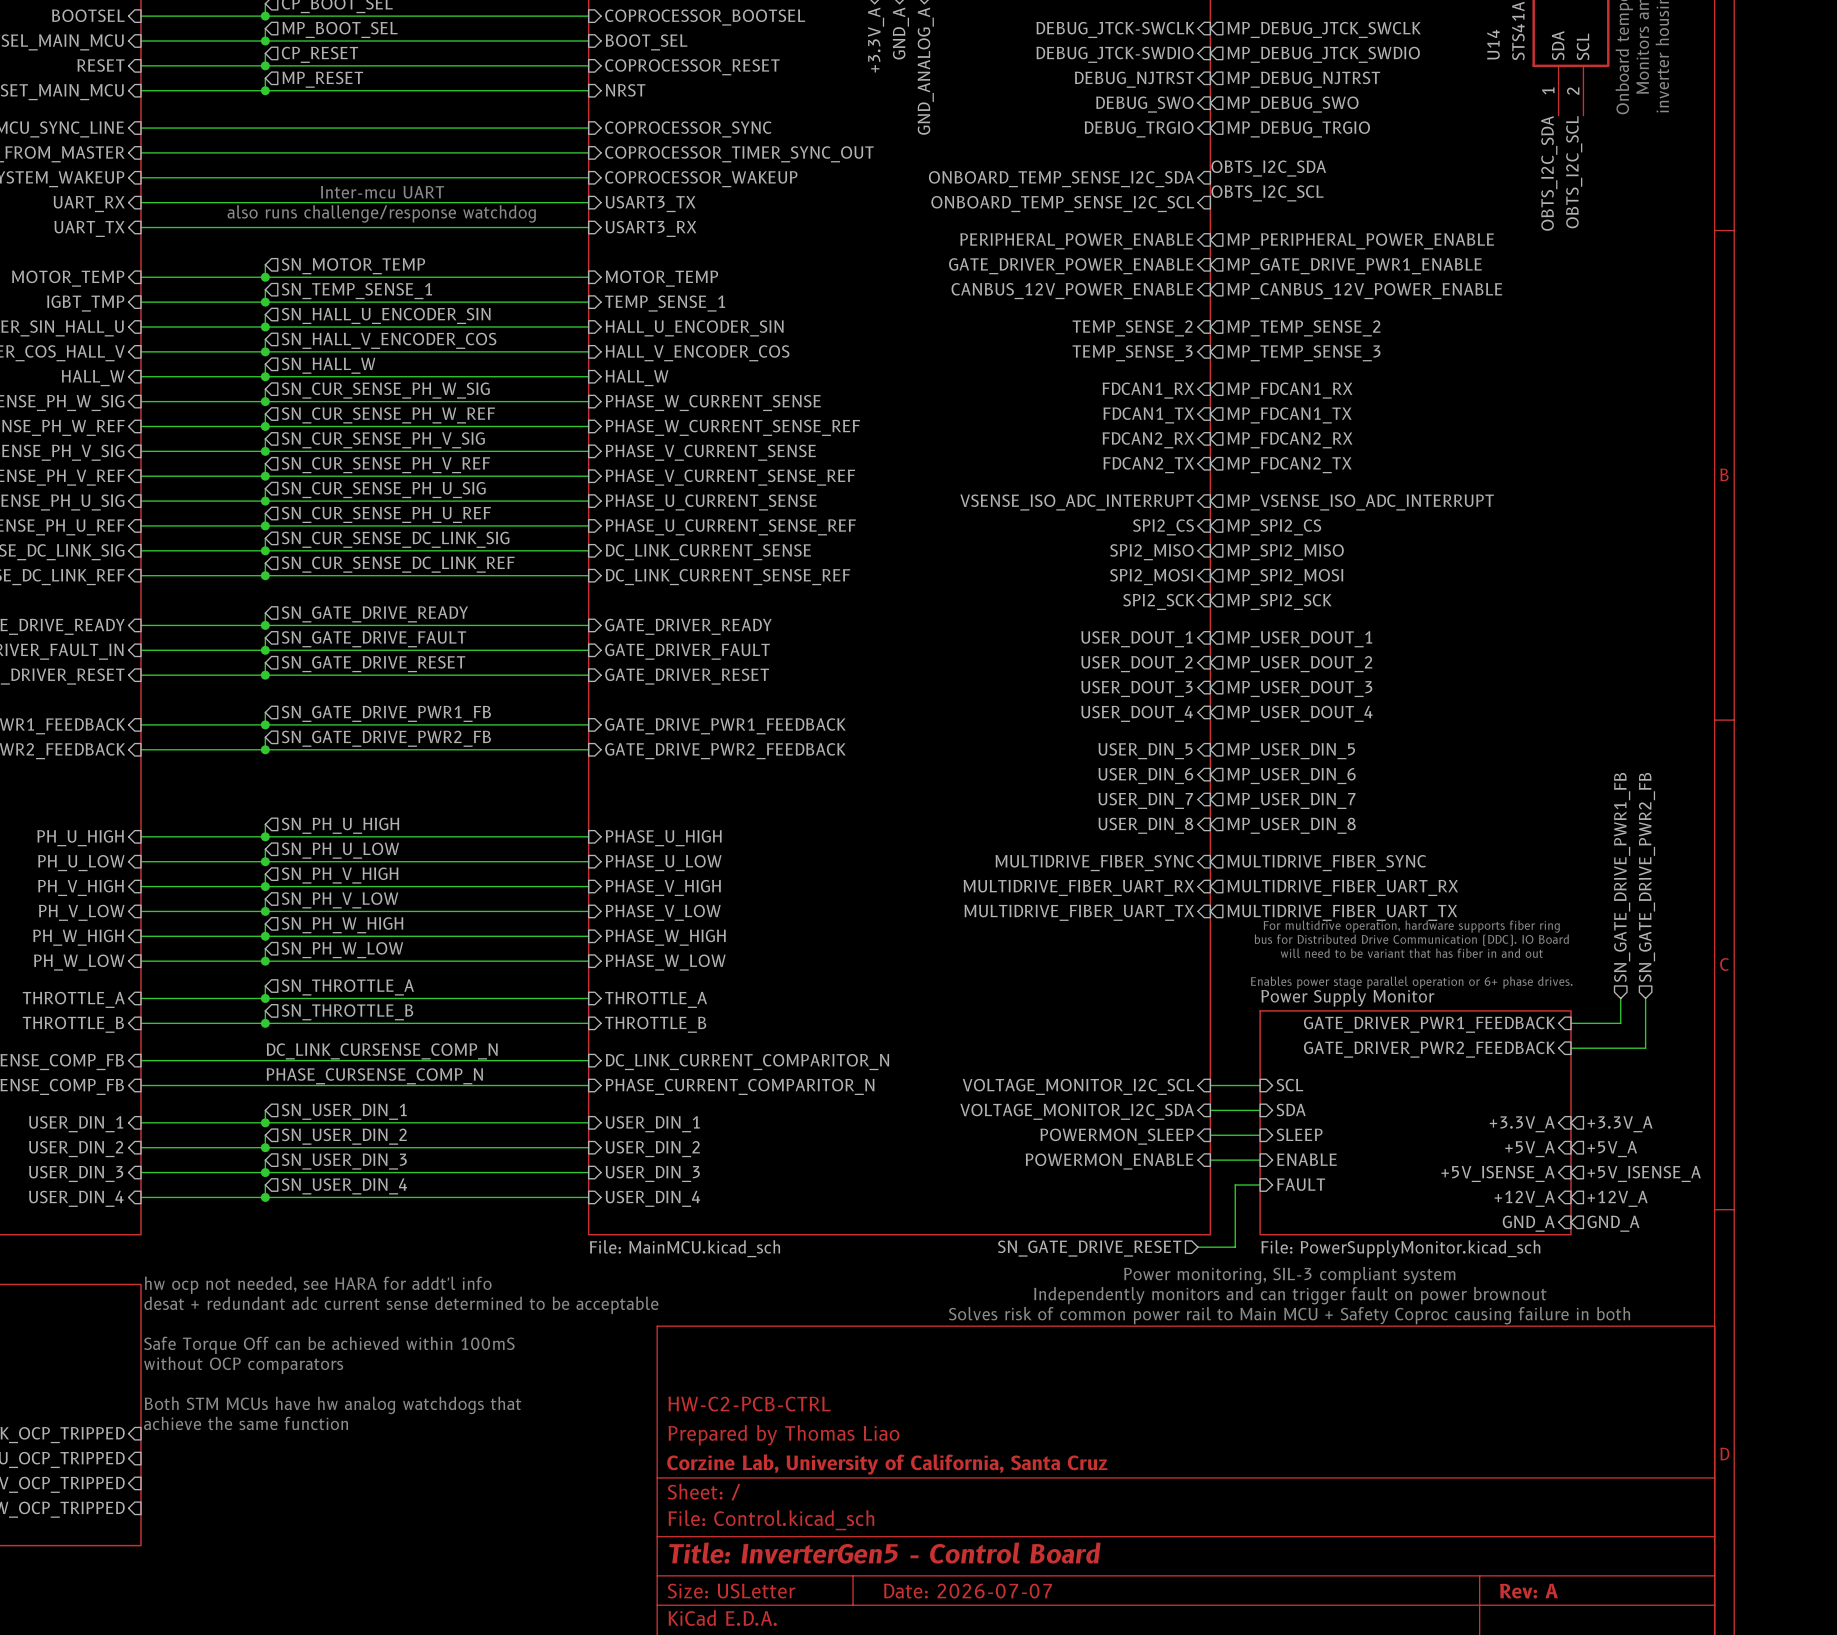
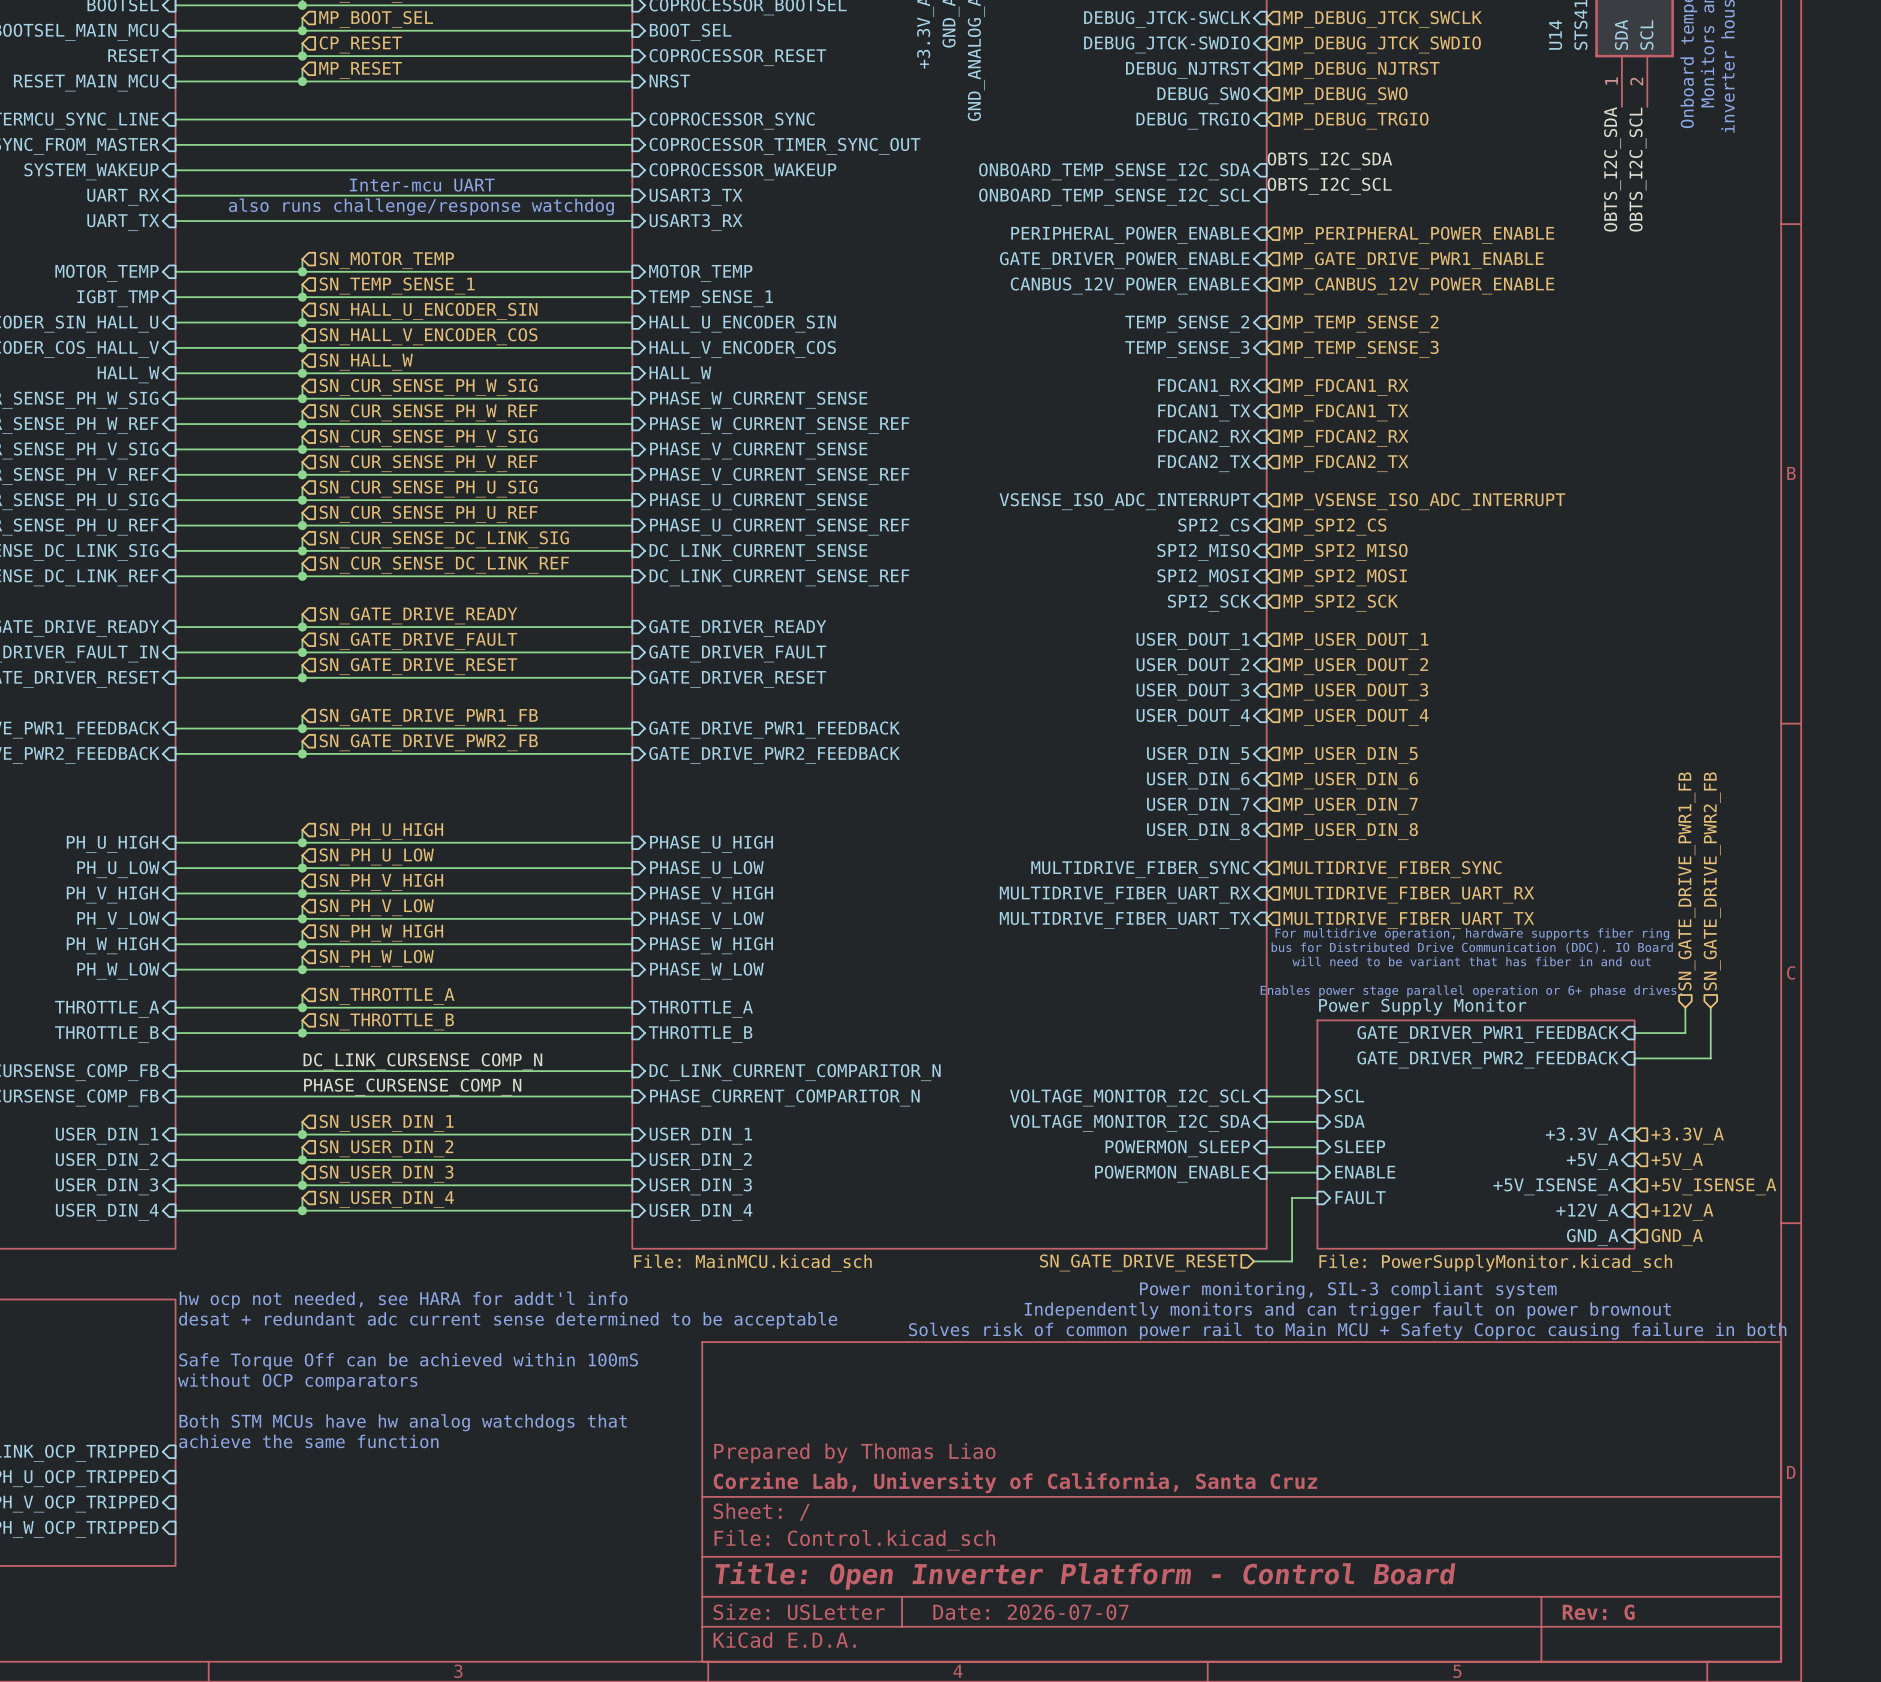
title block: HW-C2-PCB-CTRL (749, 1404) -> none
title block: Title: InverterGen5 - Control Board (884, 1553) -> Title: Open Inverter Platform - Control Board (1085, 1575)
title block: Rev: A (1528, 1591) -> Rev: G (1598, 1612)

